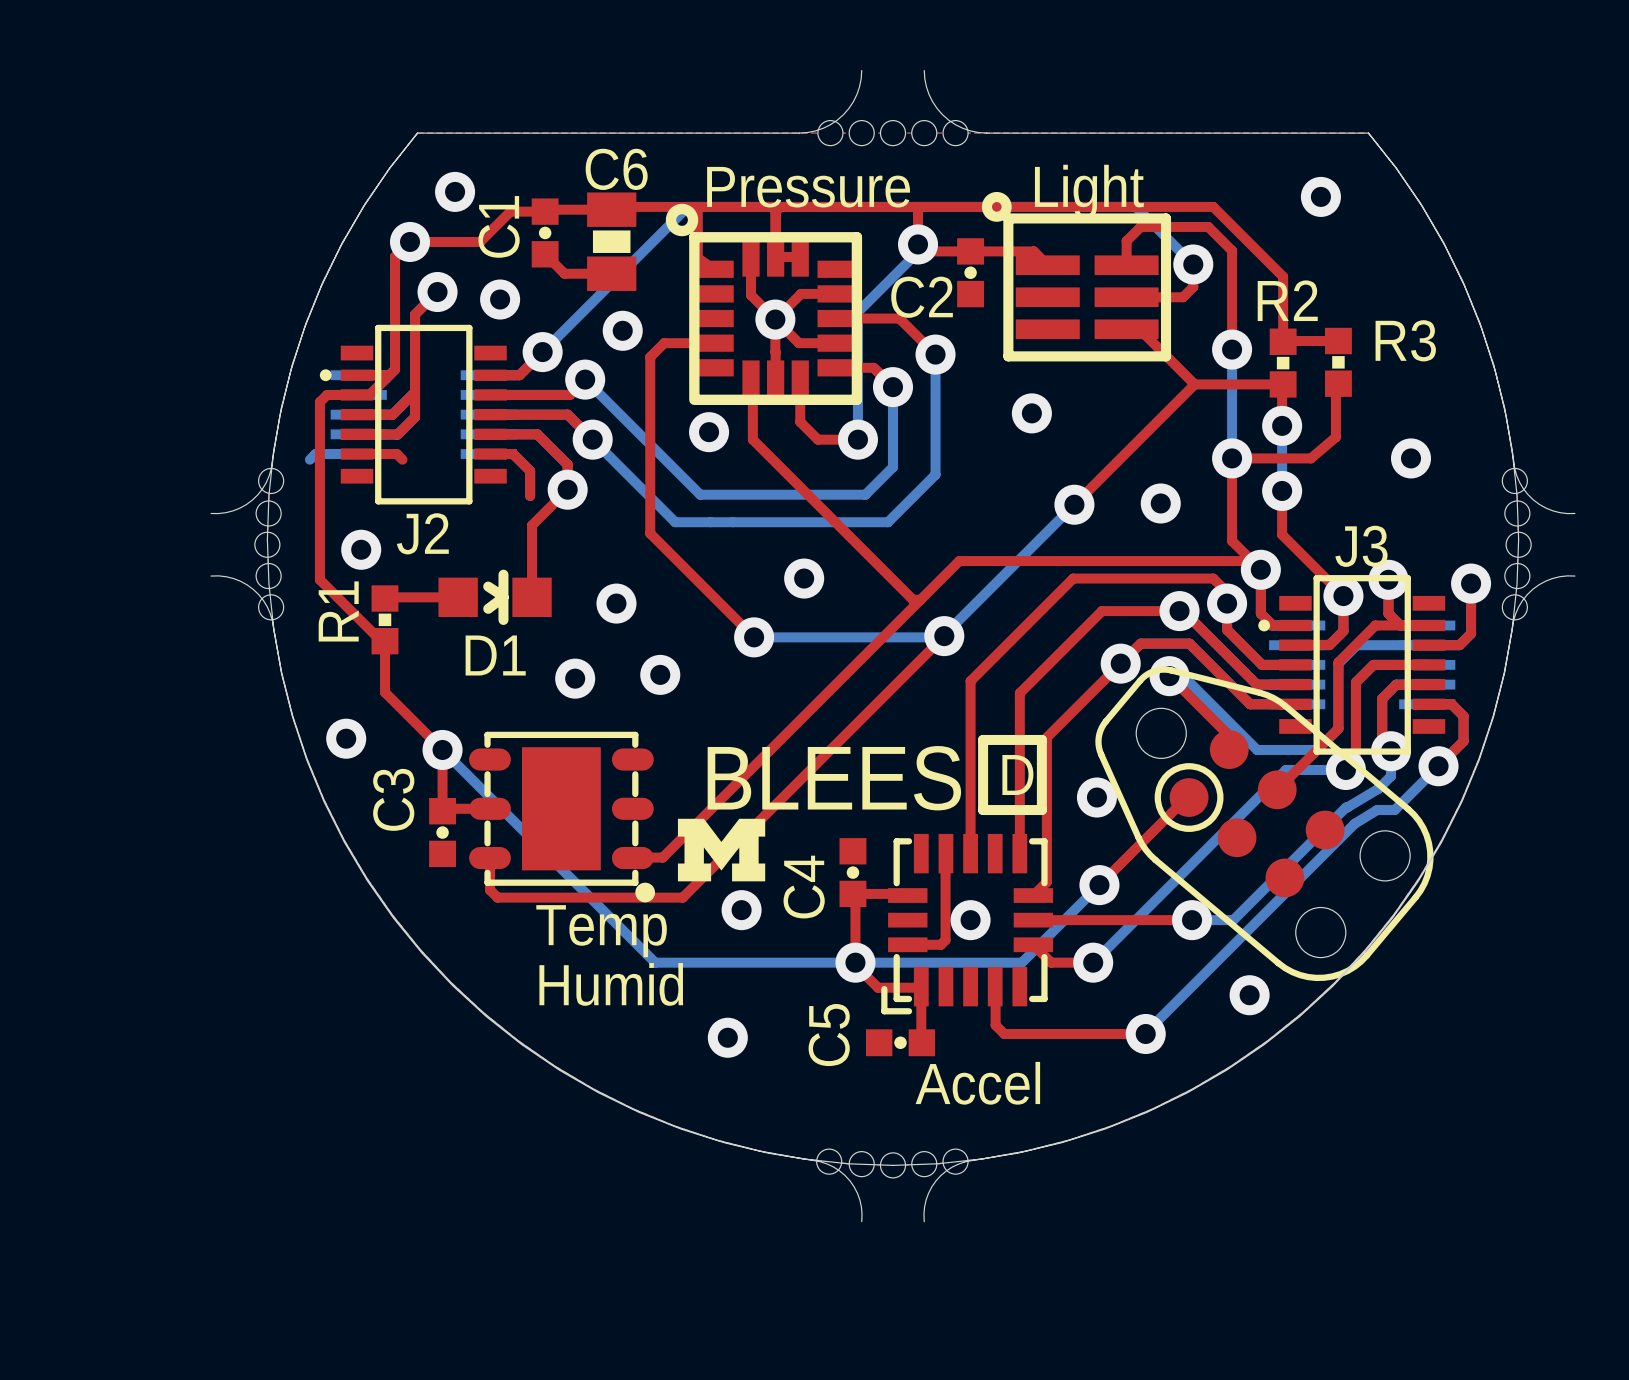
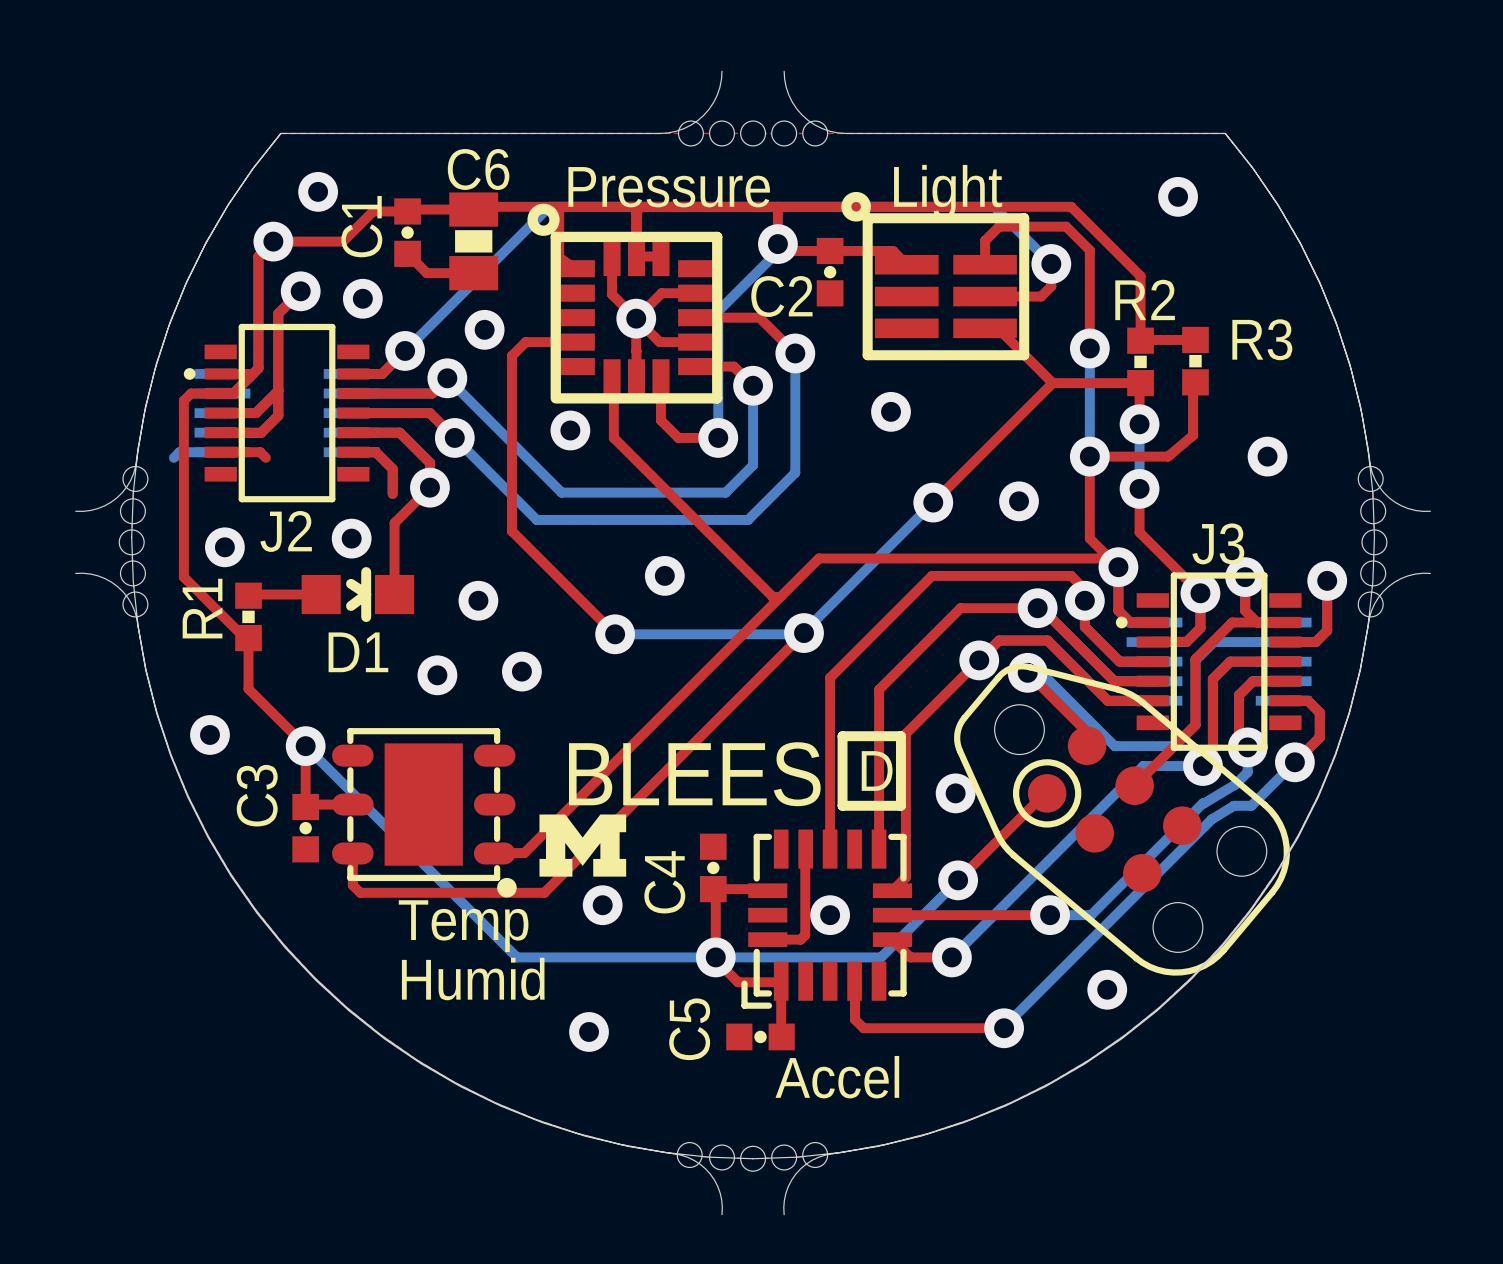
via: none -> (351, 538)

